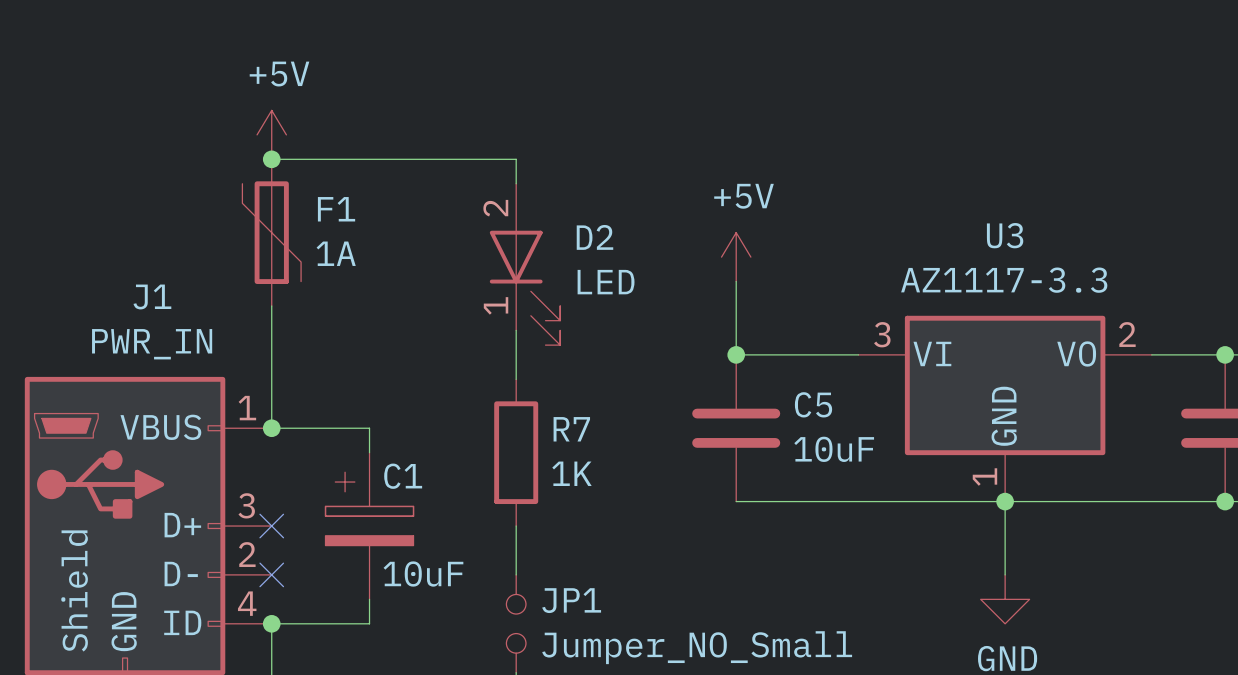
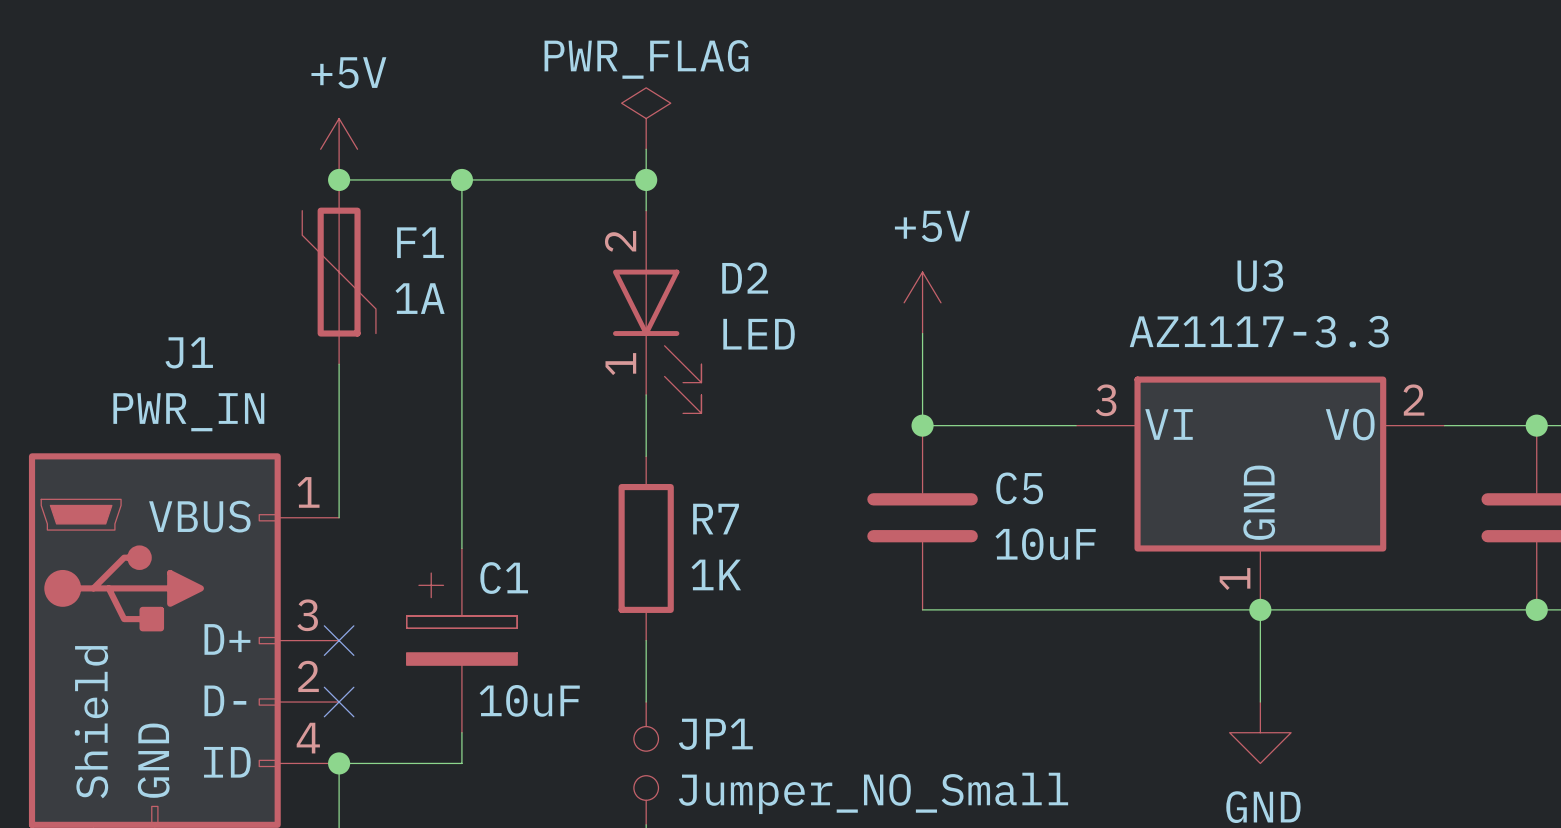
power symbol: none -> PWR_FLAG (646, 118)
wire: none -> (646, 149) (646, 179)
junction: none -> (461, 179)
junction: none -> (646, 179)
wire: (271, 428) (369, 428) -> (461, 179) (461, 517)
junction: (271, 428) -> none

